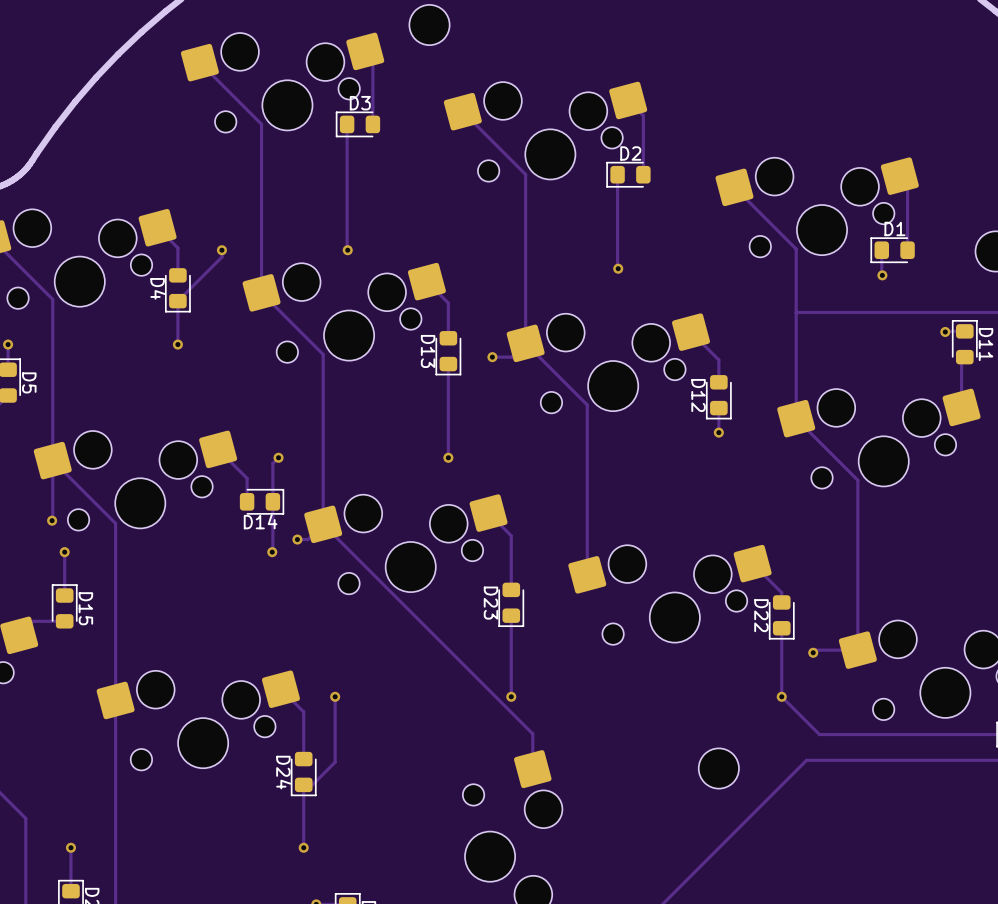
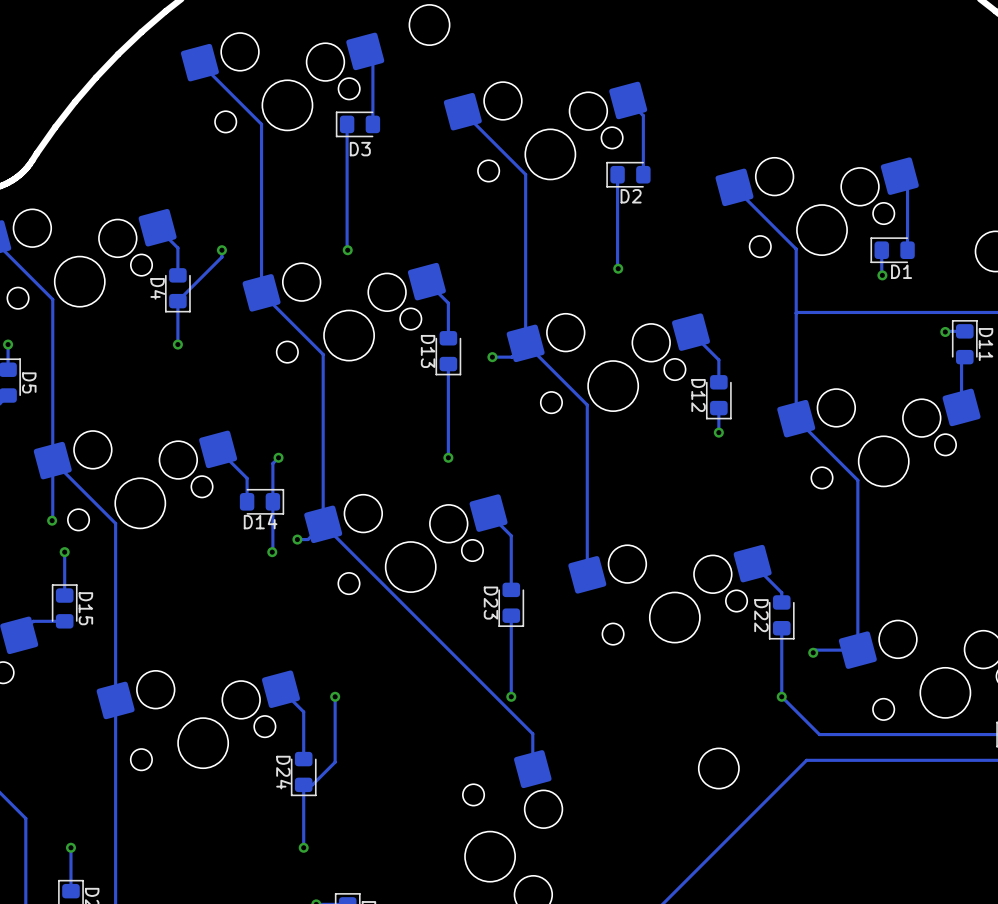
D3 name position: D3 (360, 103) -> D3 (360, 149)
D2 name position: D2 (630, 153) -> D2 (631, 196)
D1 name position: D1 (894, 228) -> D1 (901, 271)

